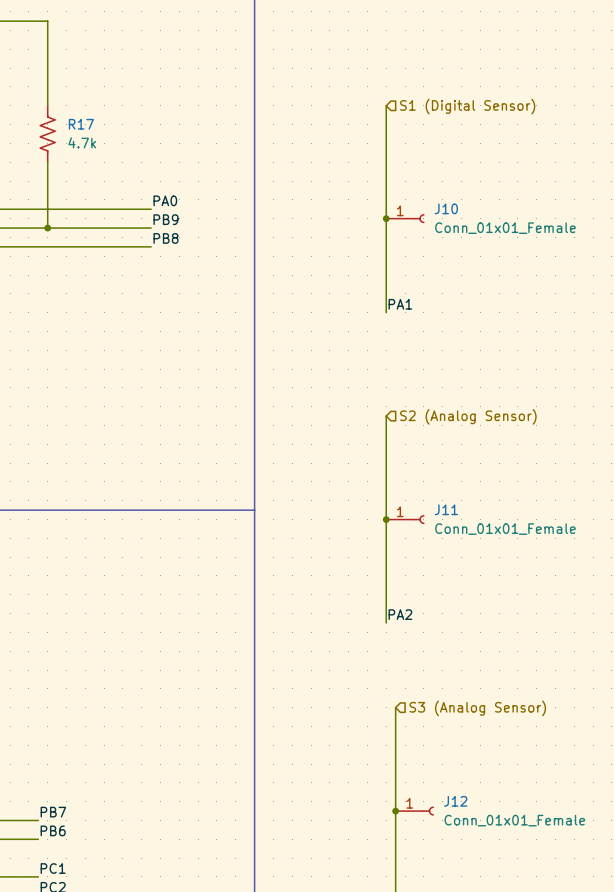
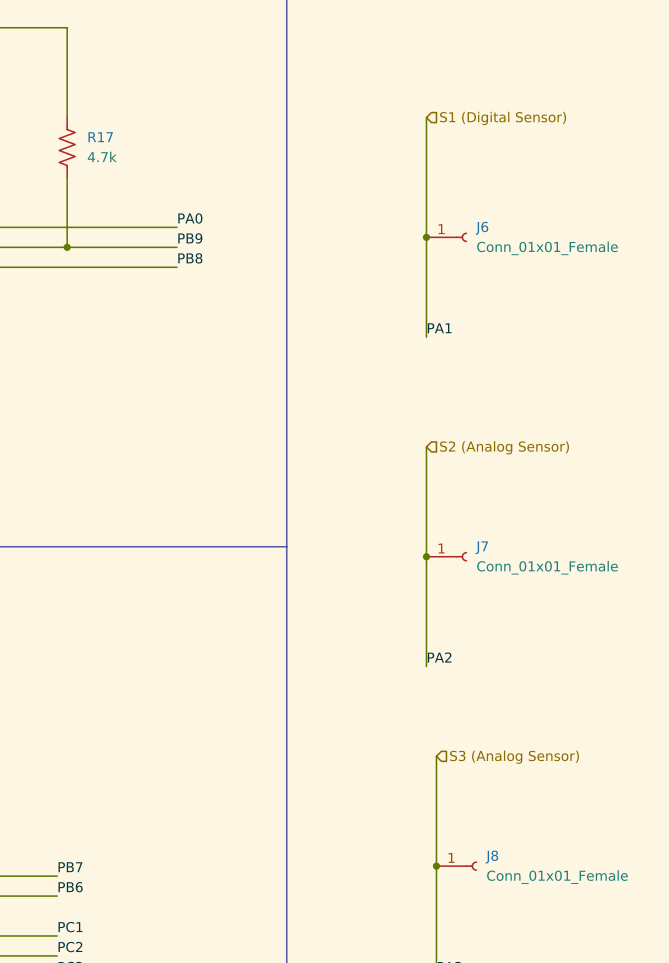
J10 name: J10 (446, 208) -> J6 (481, 228)
J11 name: J11 (446, 509) -> J7 (481, 547)
J12 name: J12 (455, 801) -> J8 (491, 857)

